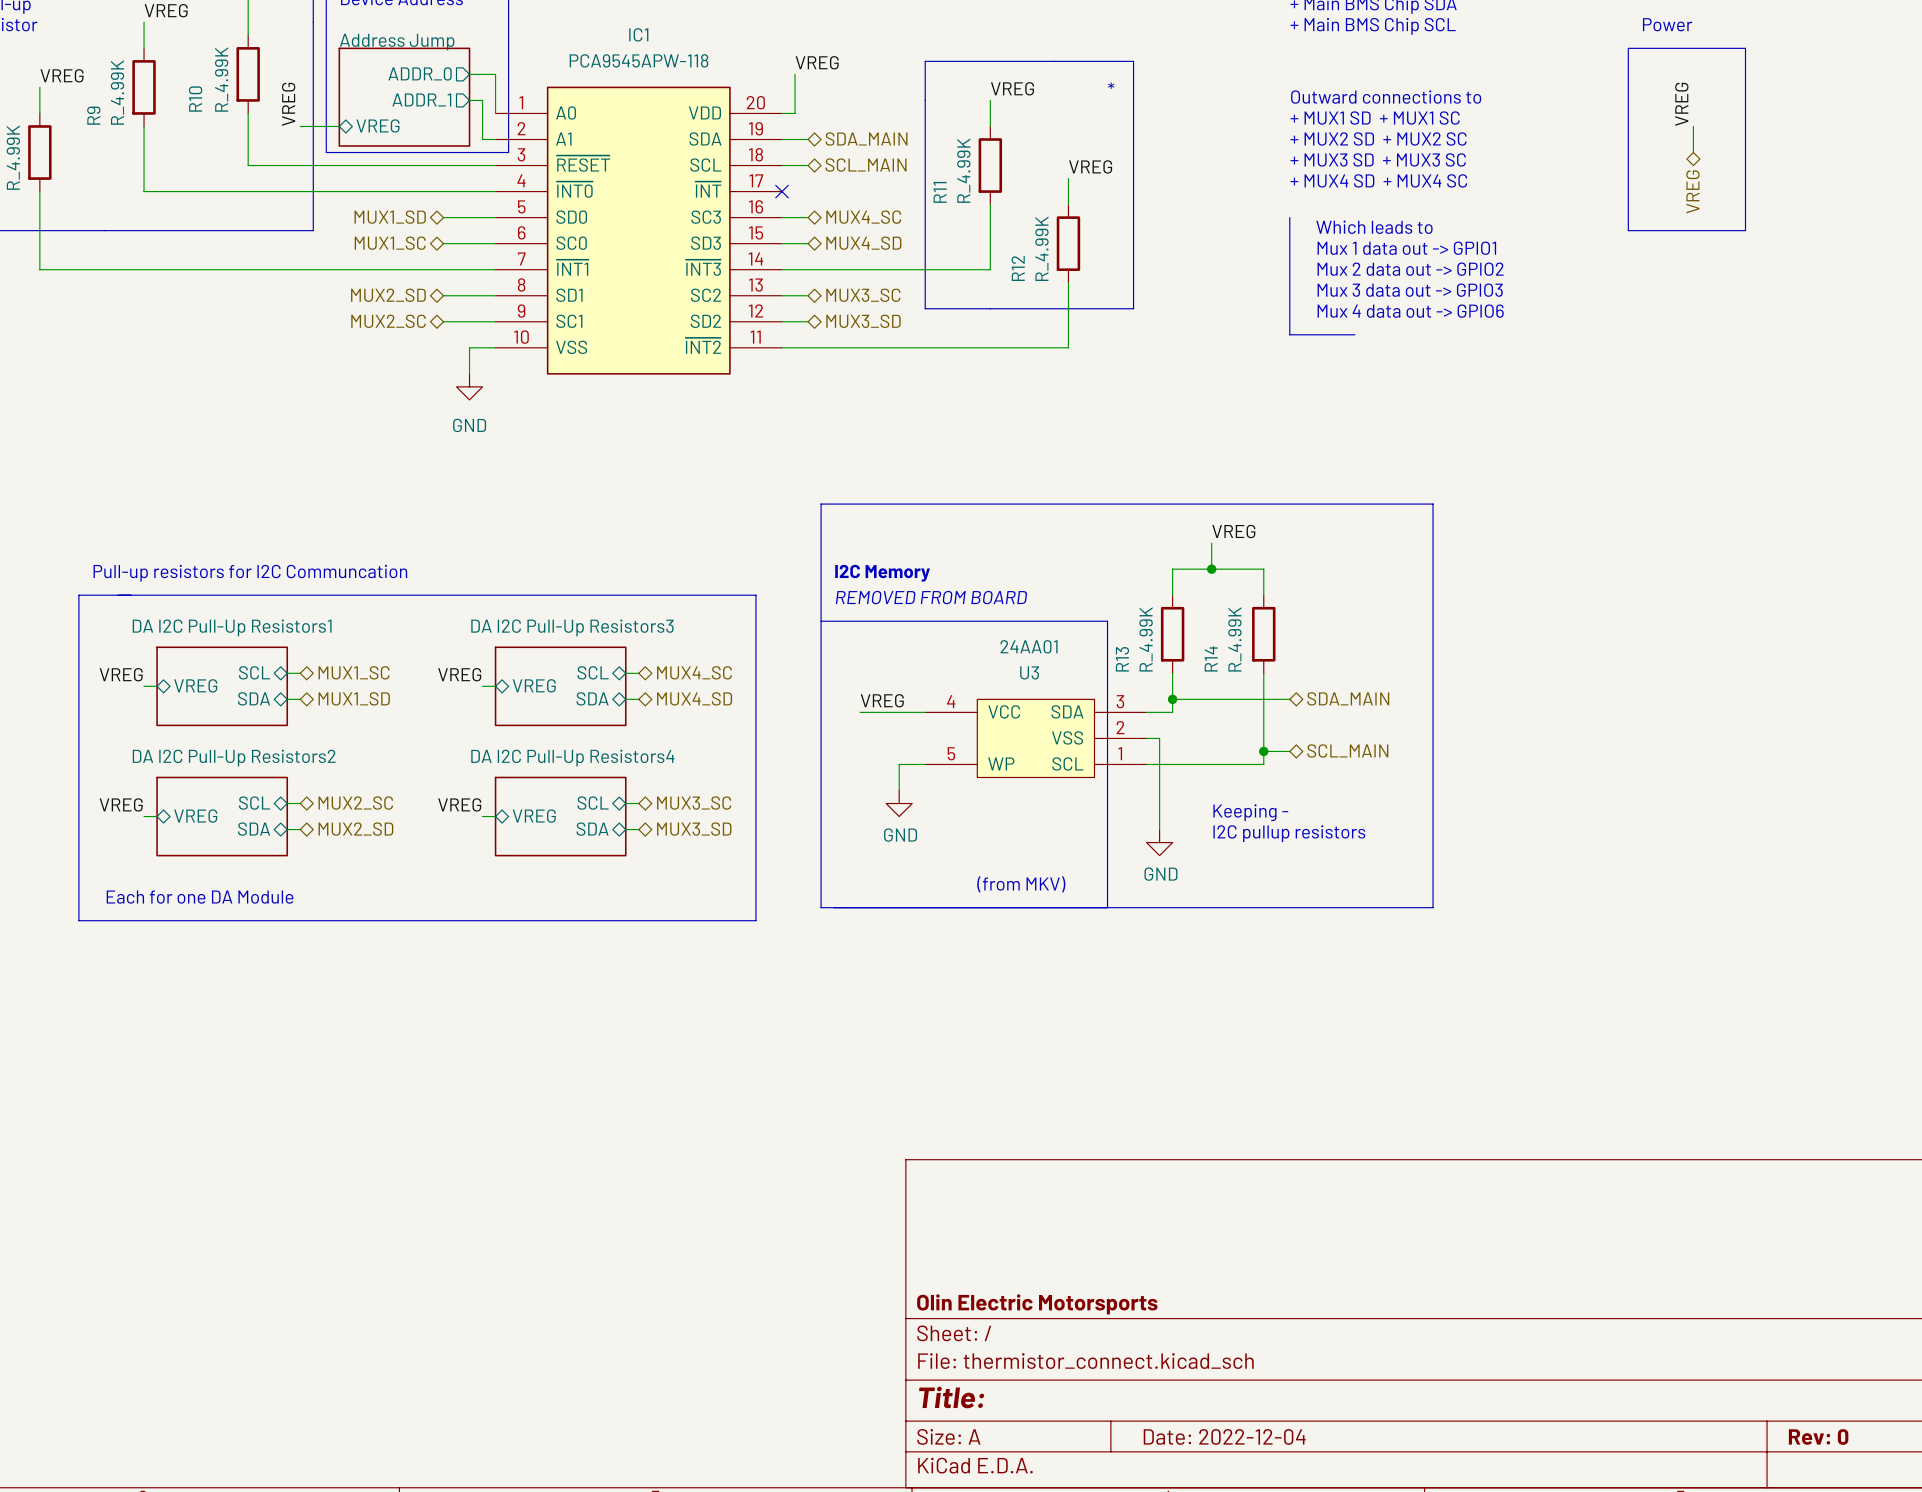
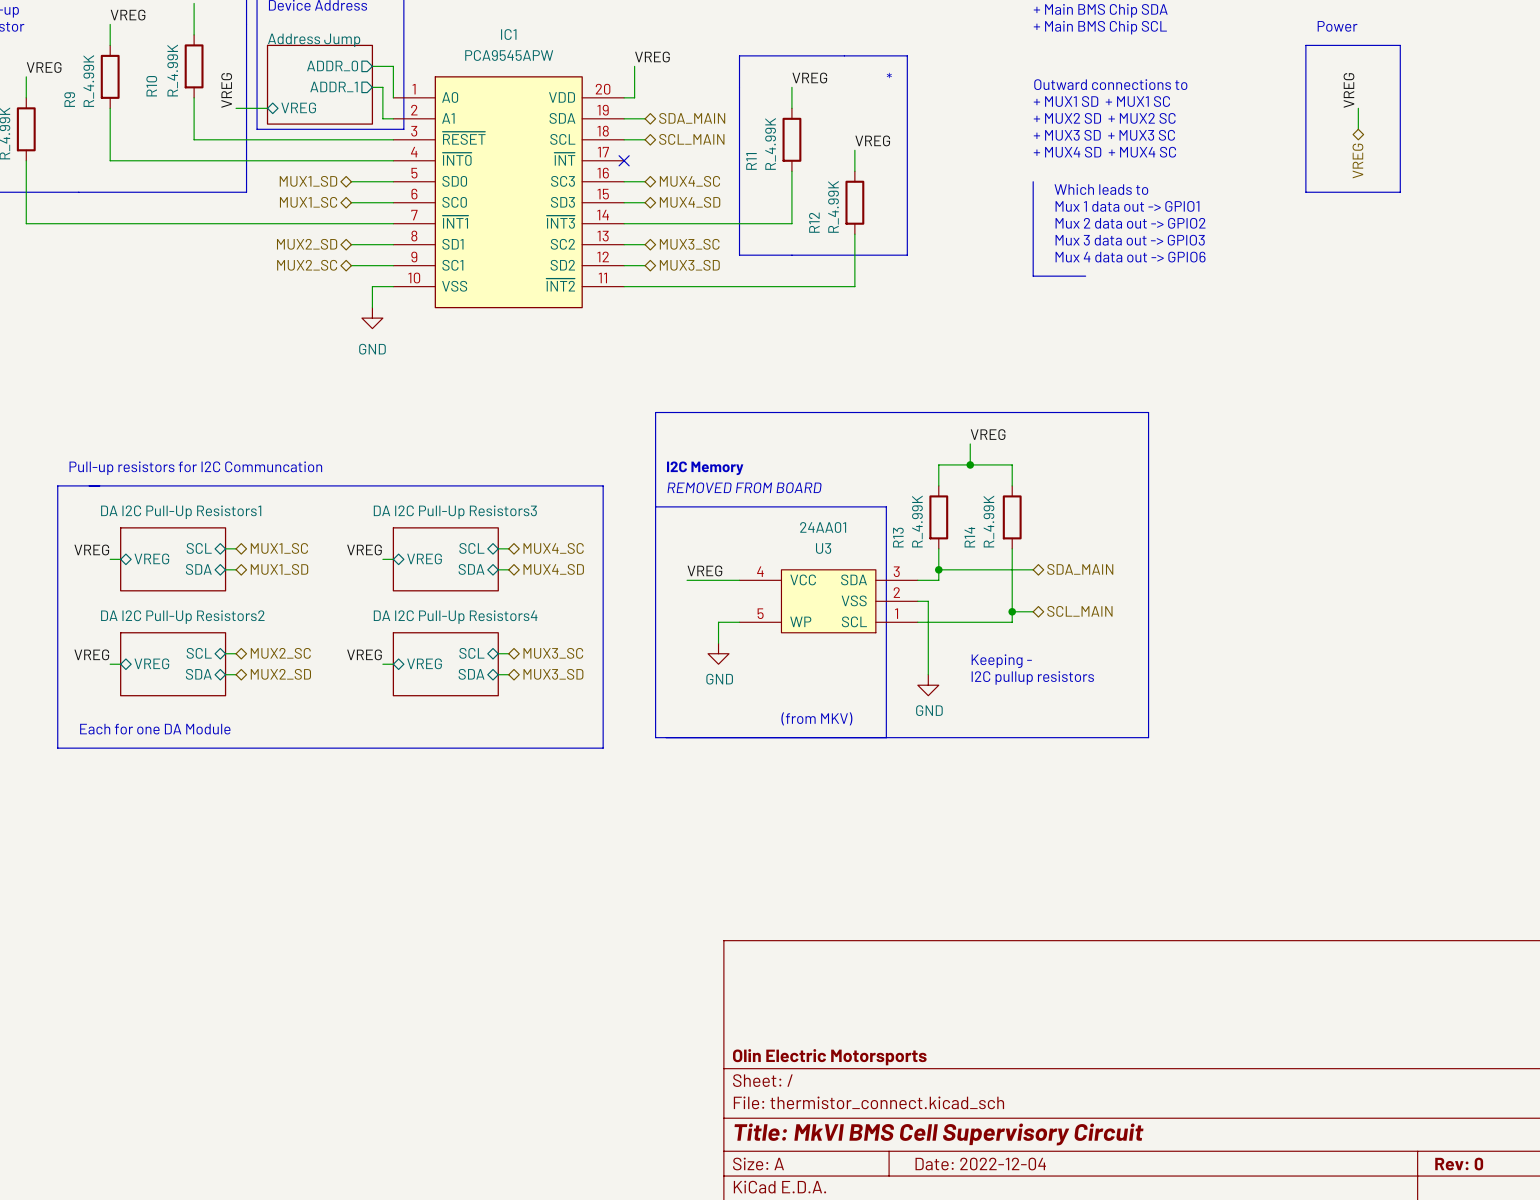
IC1 value: PCA9545APW-118 (639, 60) -> PCA9545APW (509, 55)
title block: Title: (951, 1397) -> Title: MkVI BMS Cell Supervisory Circuit (938, 1134)

